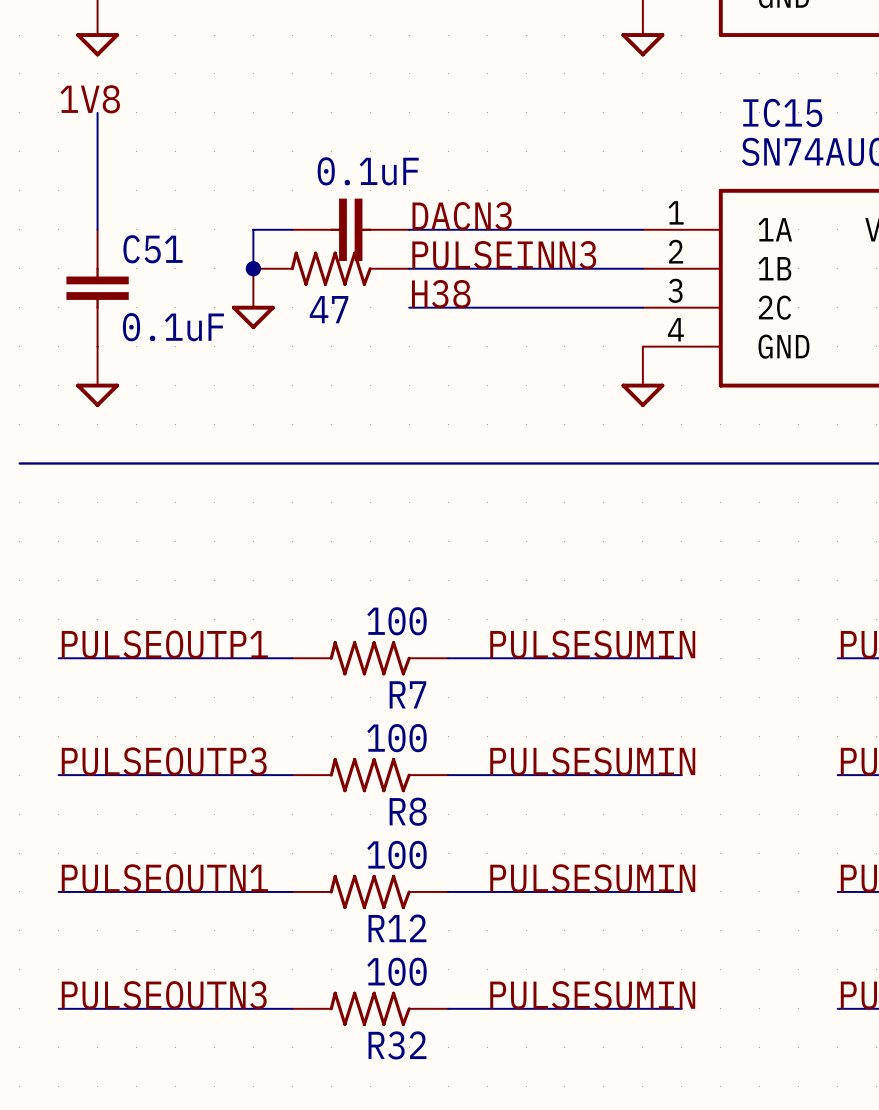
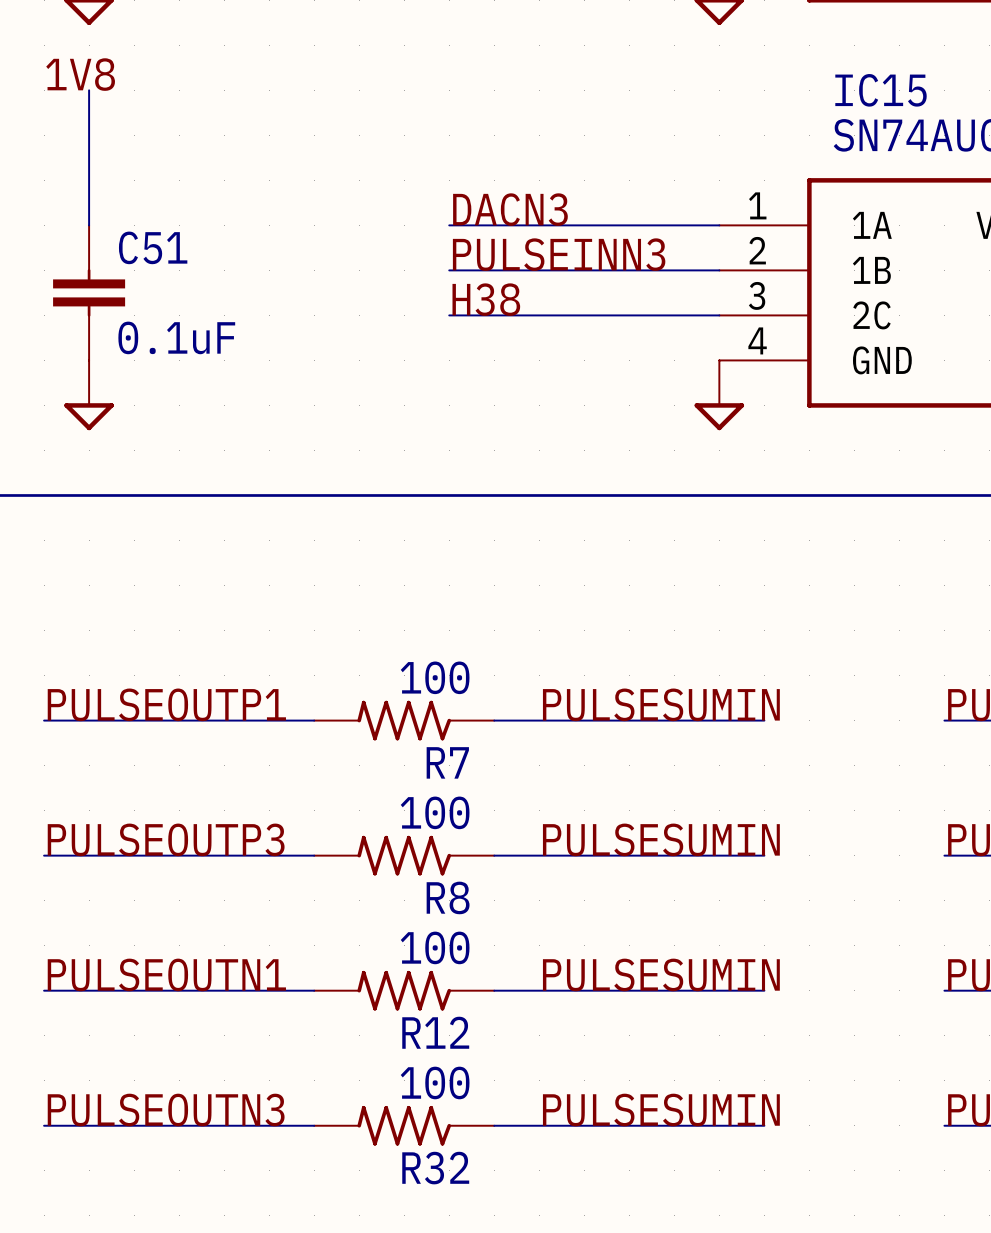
wire: (292, 229) (253, 229) (253, 268) -> none
part: 0.1uF (350, 229) -> none
junction: (253, 268) -> none
part: 47 (331, 268) -> none
power symbol: (253, 298) -> none

